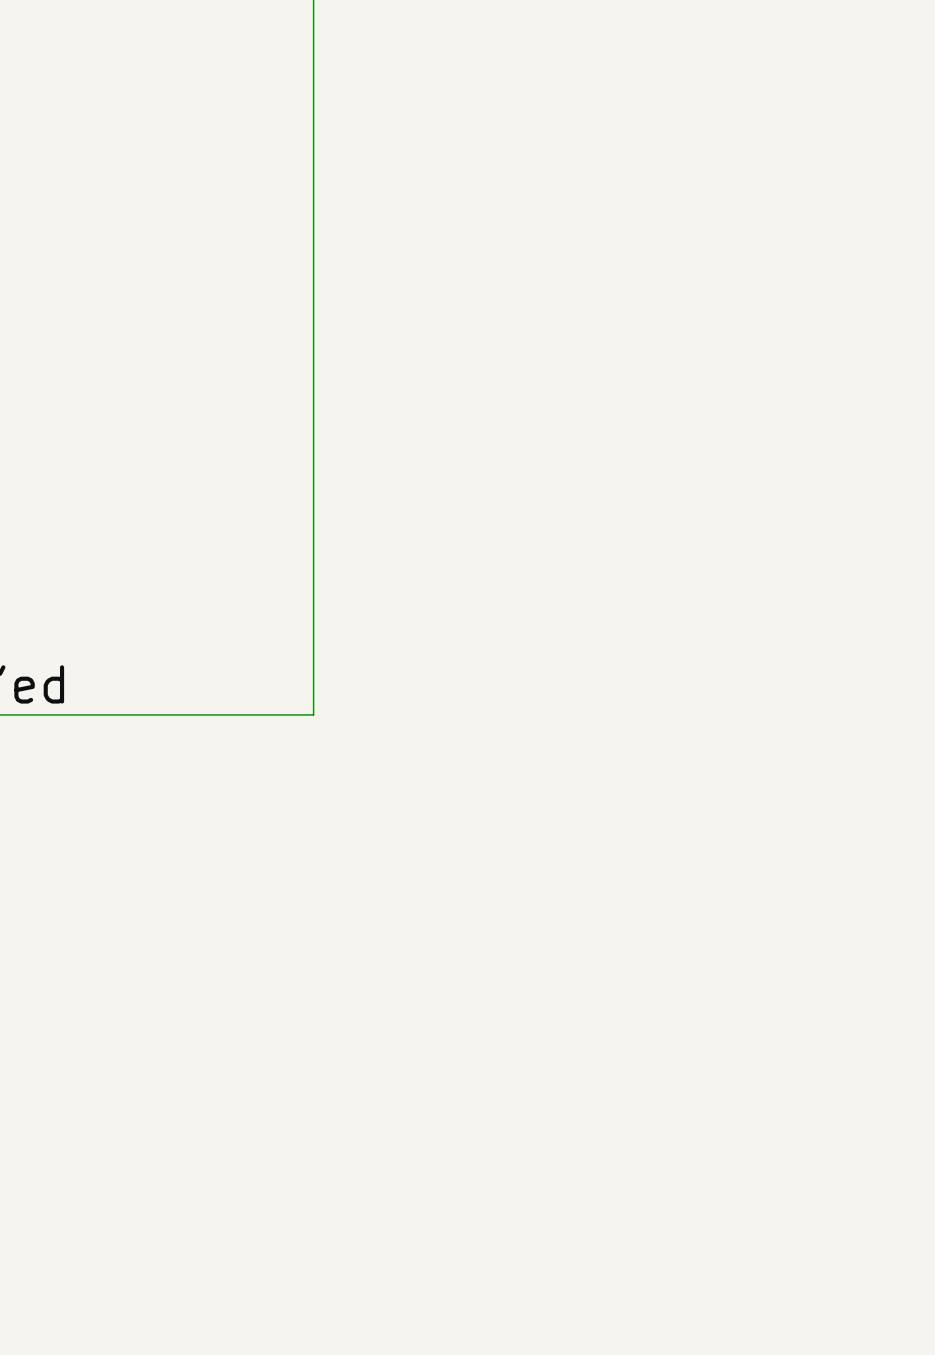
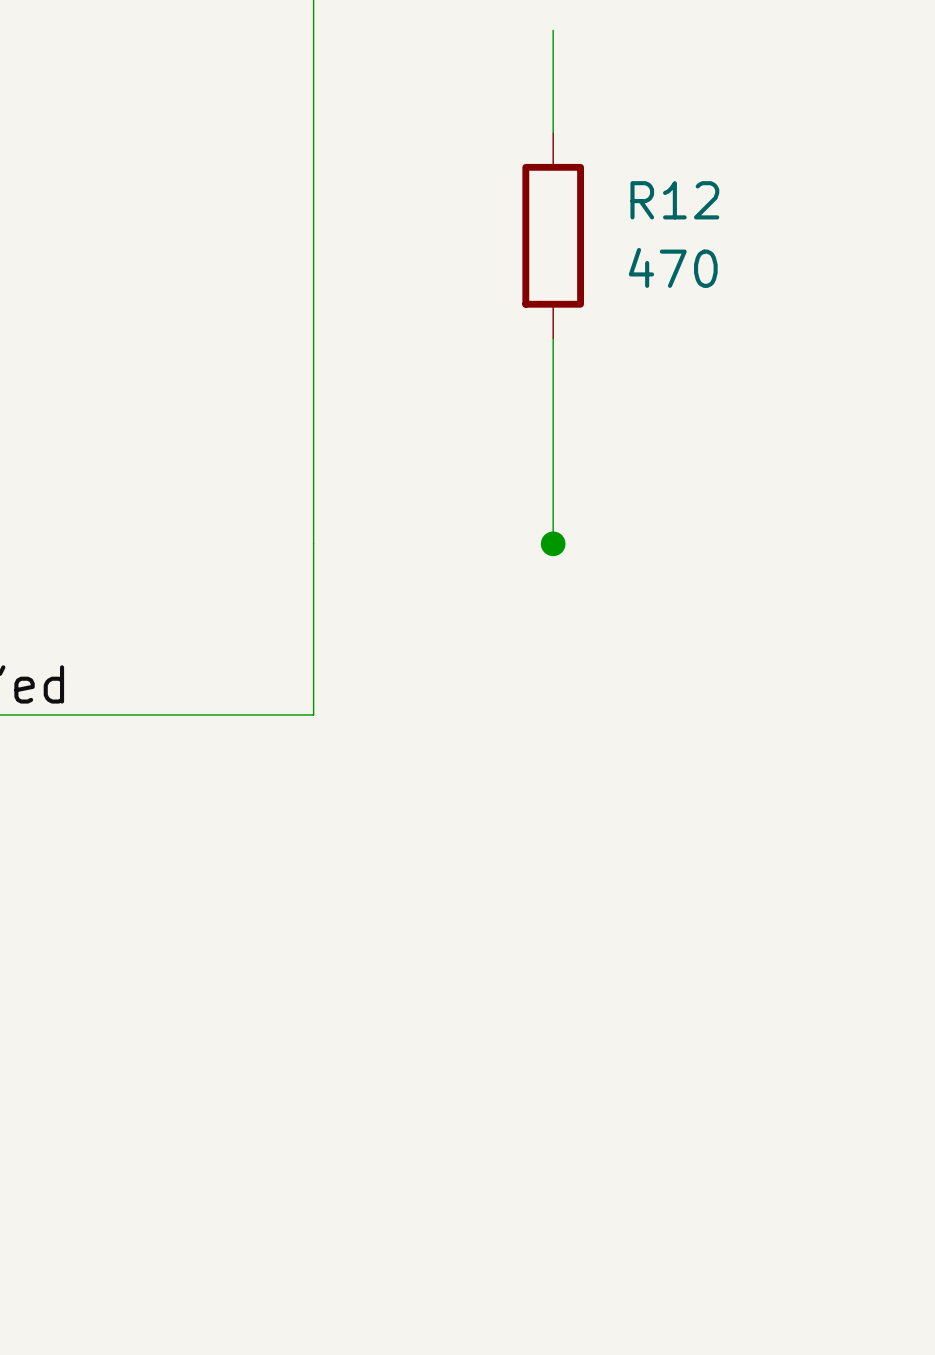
wire: none -> (553, 30) (553, 133)
R12: none -> 470 (553, 235)
wire: none -> (553, 338) (553, 543)
junction: none -> (553, 543)

